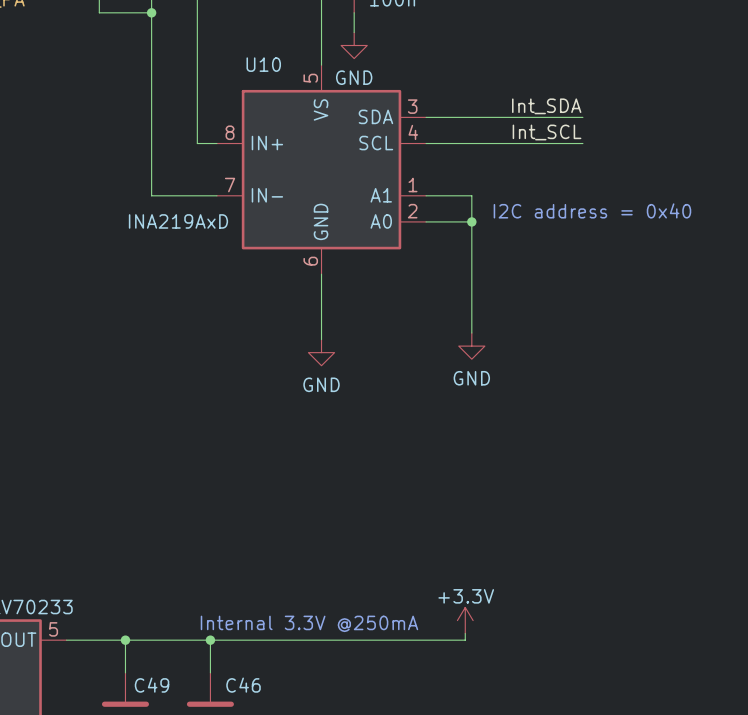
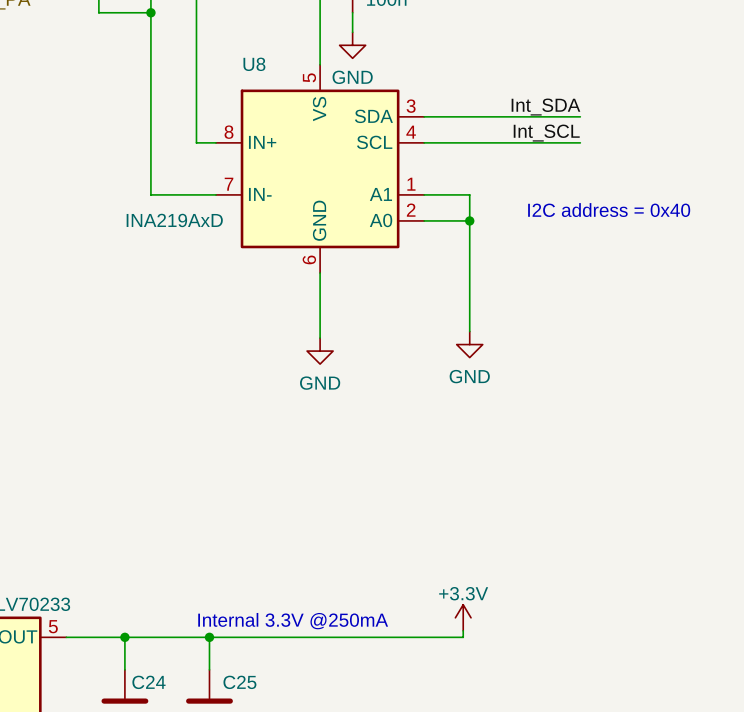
U10 name: U10 (263, 64) -> U8 (254, 64)
C49 name: C49 (152, 685) -> C24 (148, 682)
C46 name: C46 (243, 685) -> C25 (239, 682)

